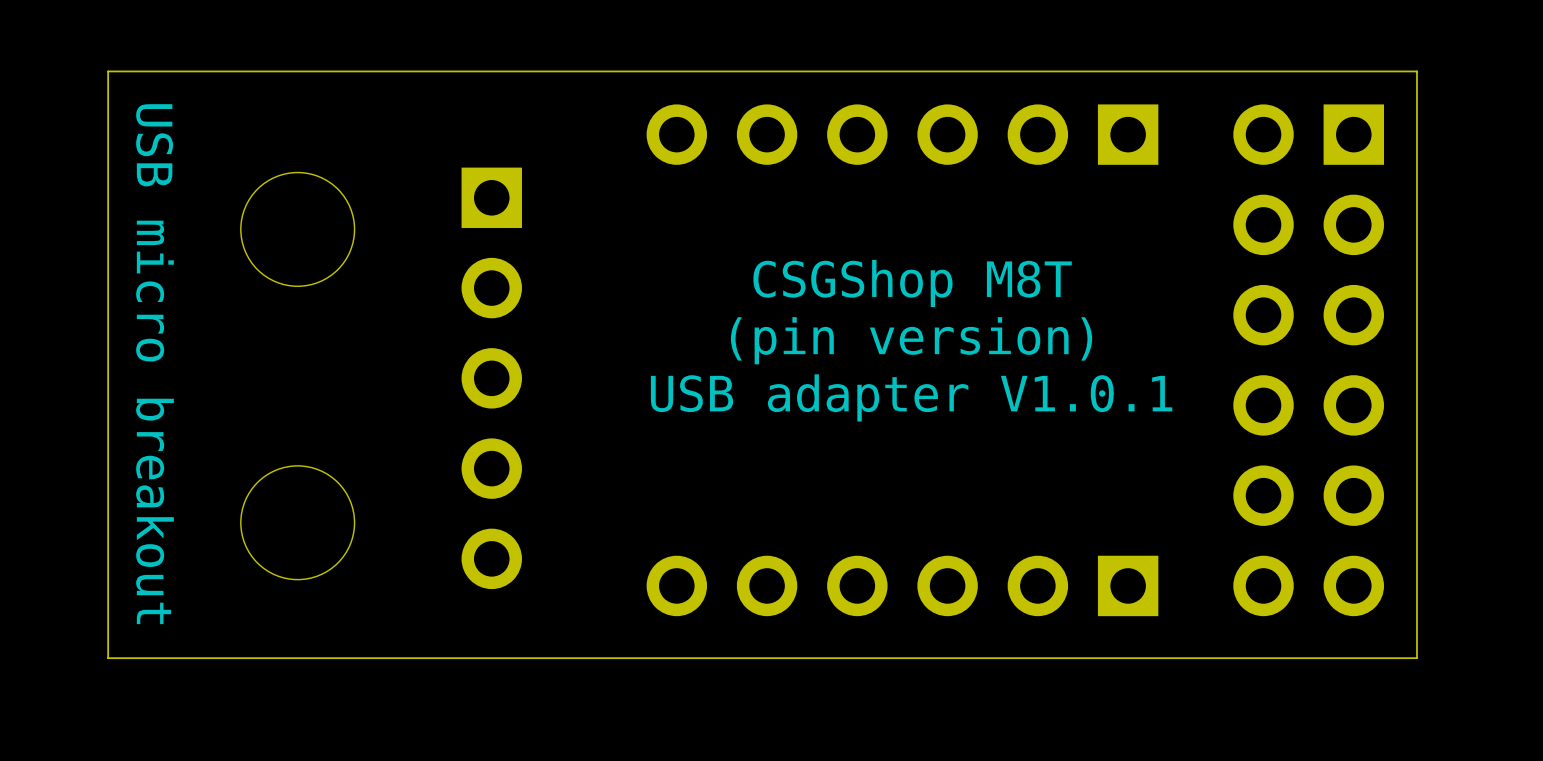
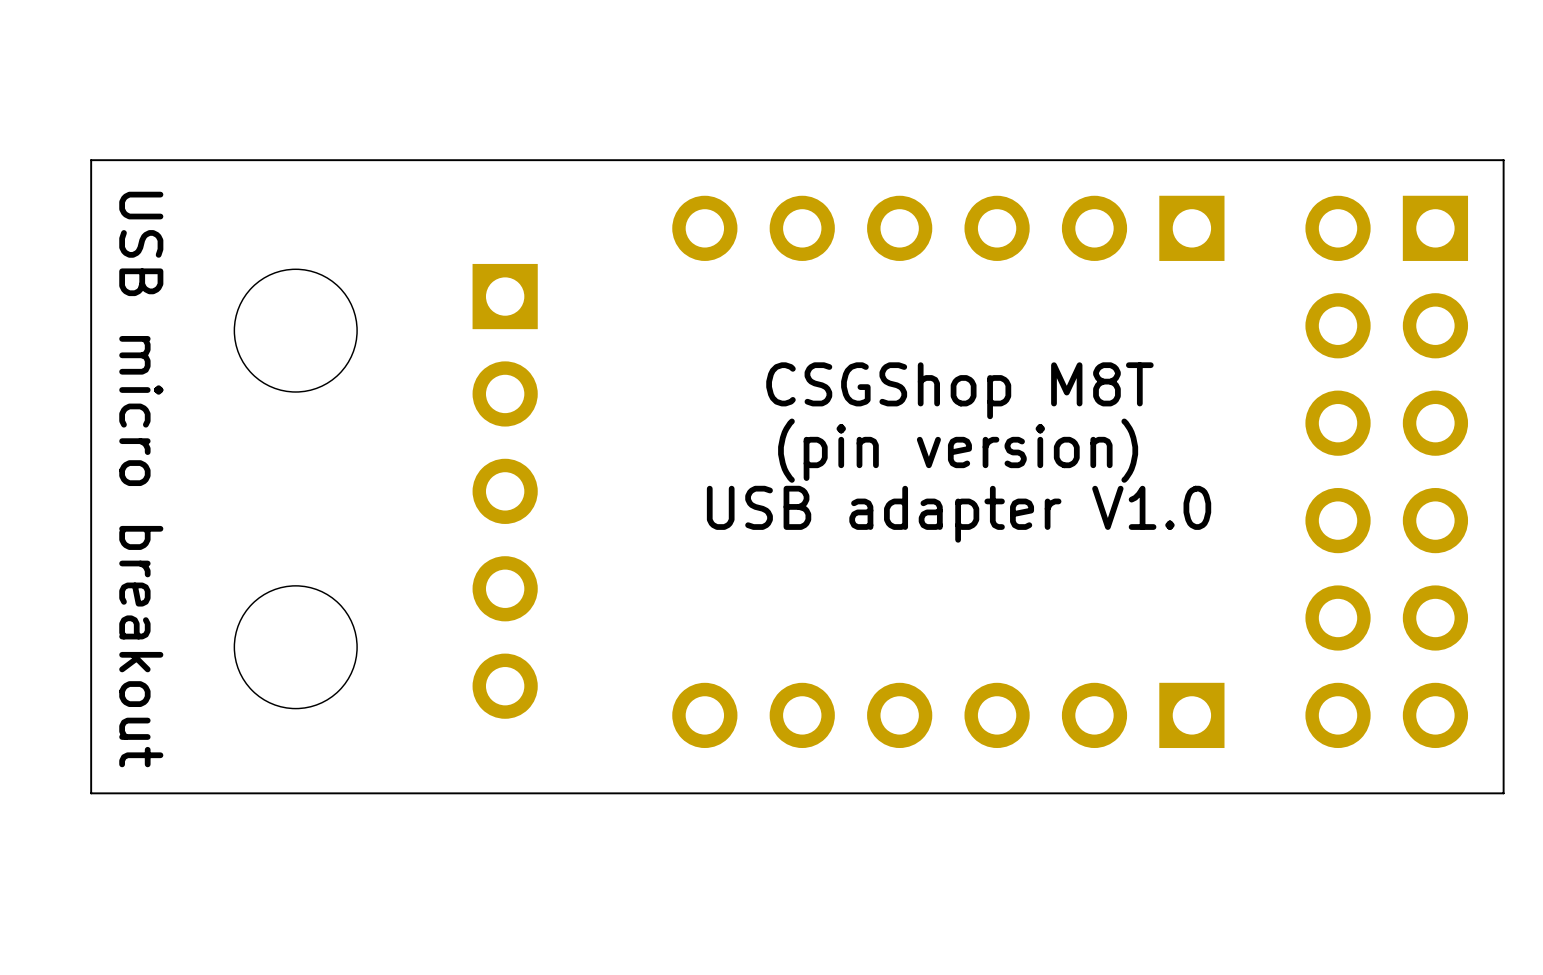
text: USB adapter V1.0.1 (911, 397) -> USB adapter V1.0 (959, 514)

